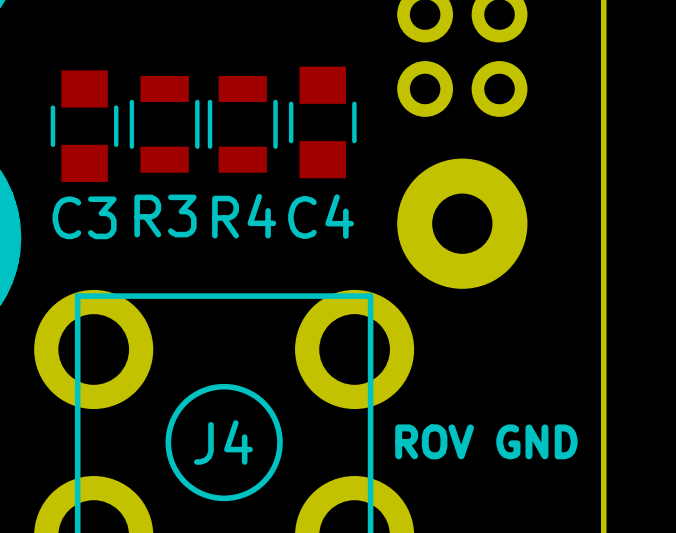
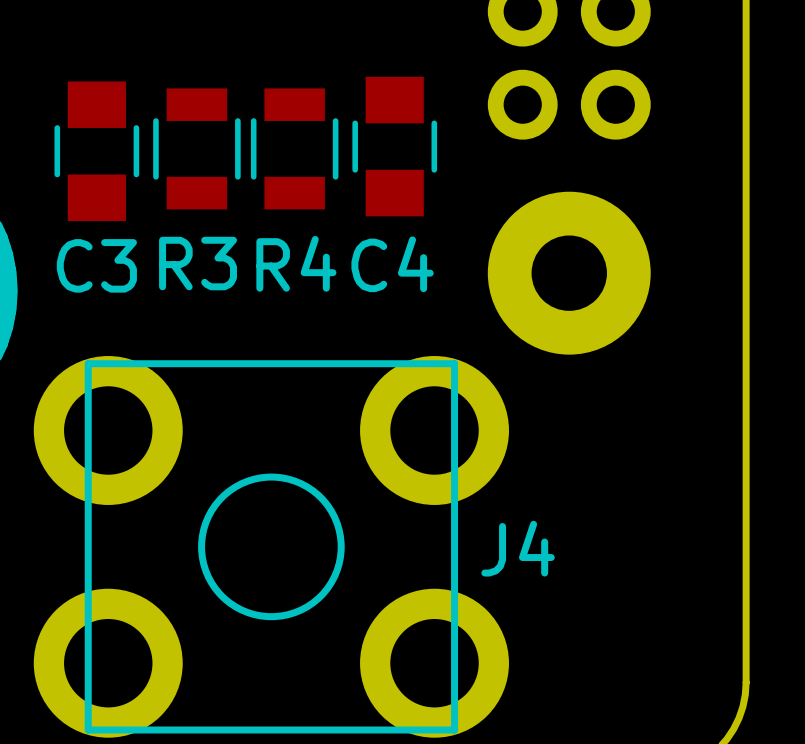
text: ROV GND (486, 441) -> none
J4 name position: J4 (223, 442) -> J4 (518, 548)

